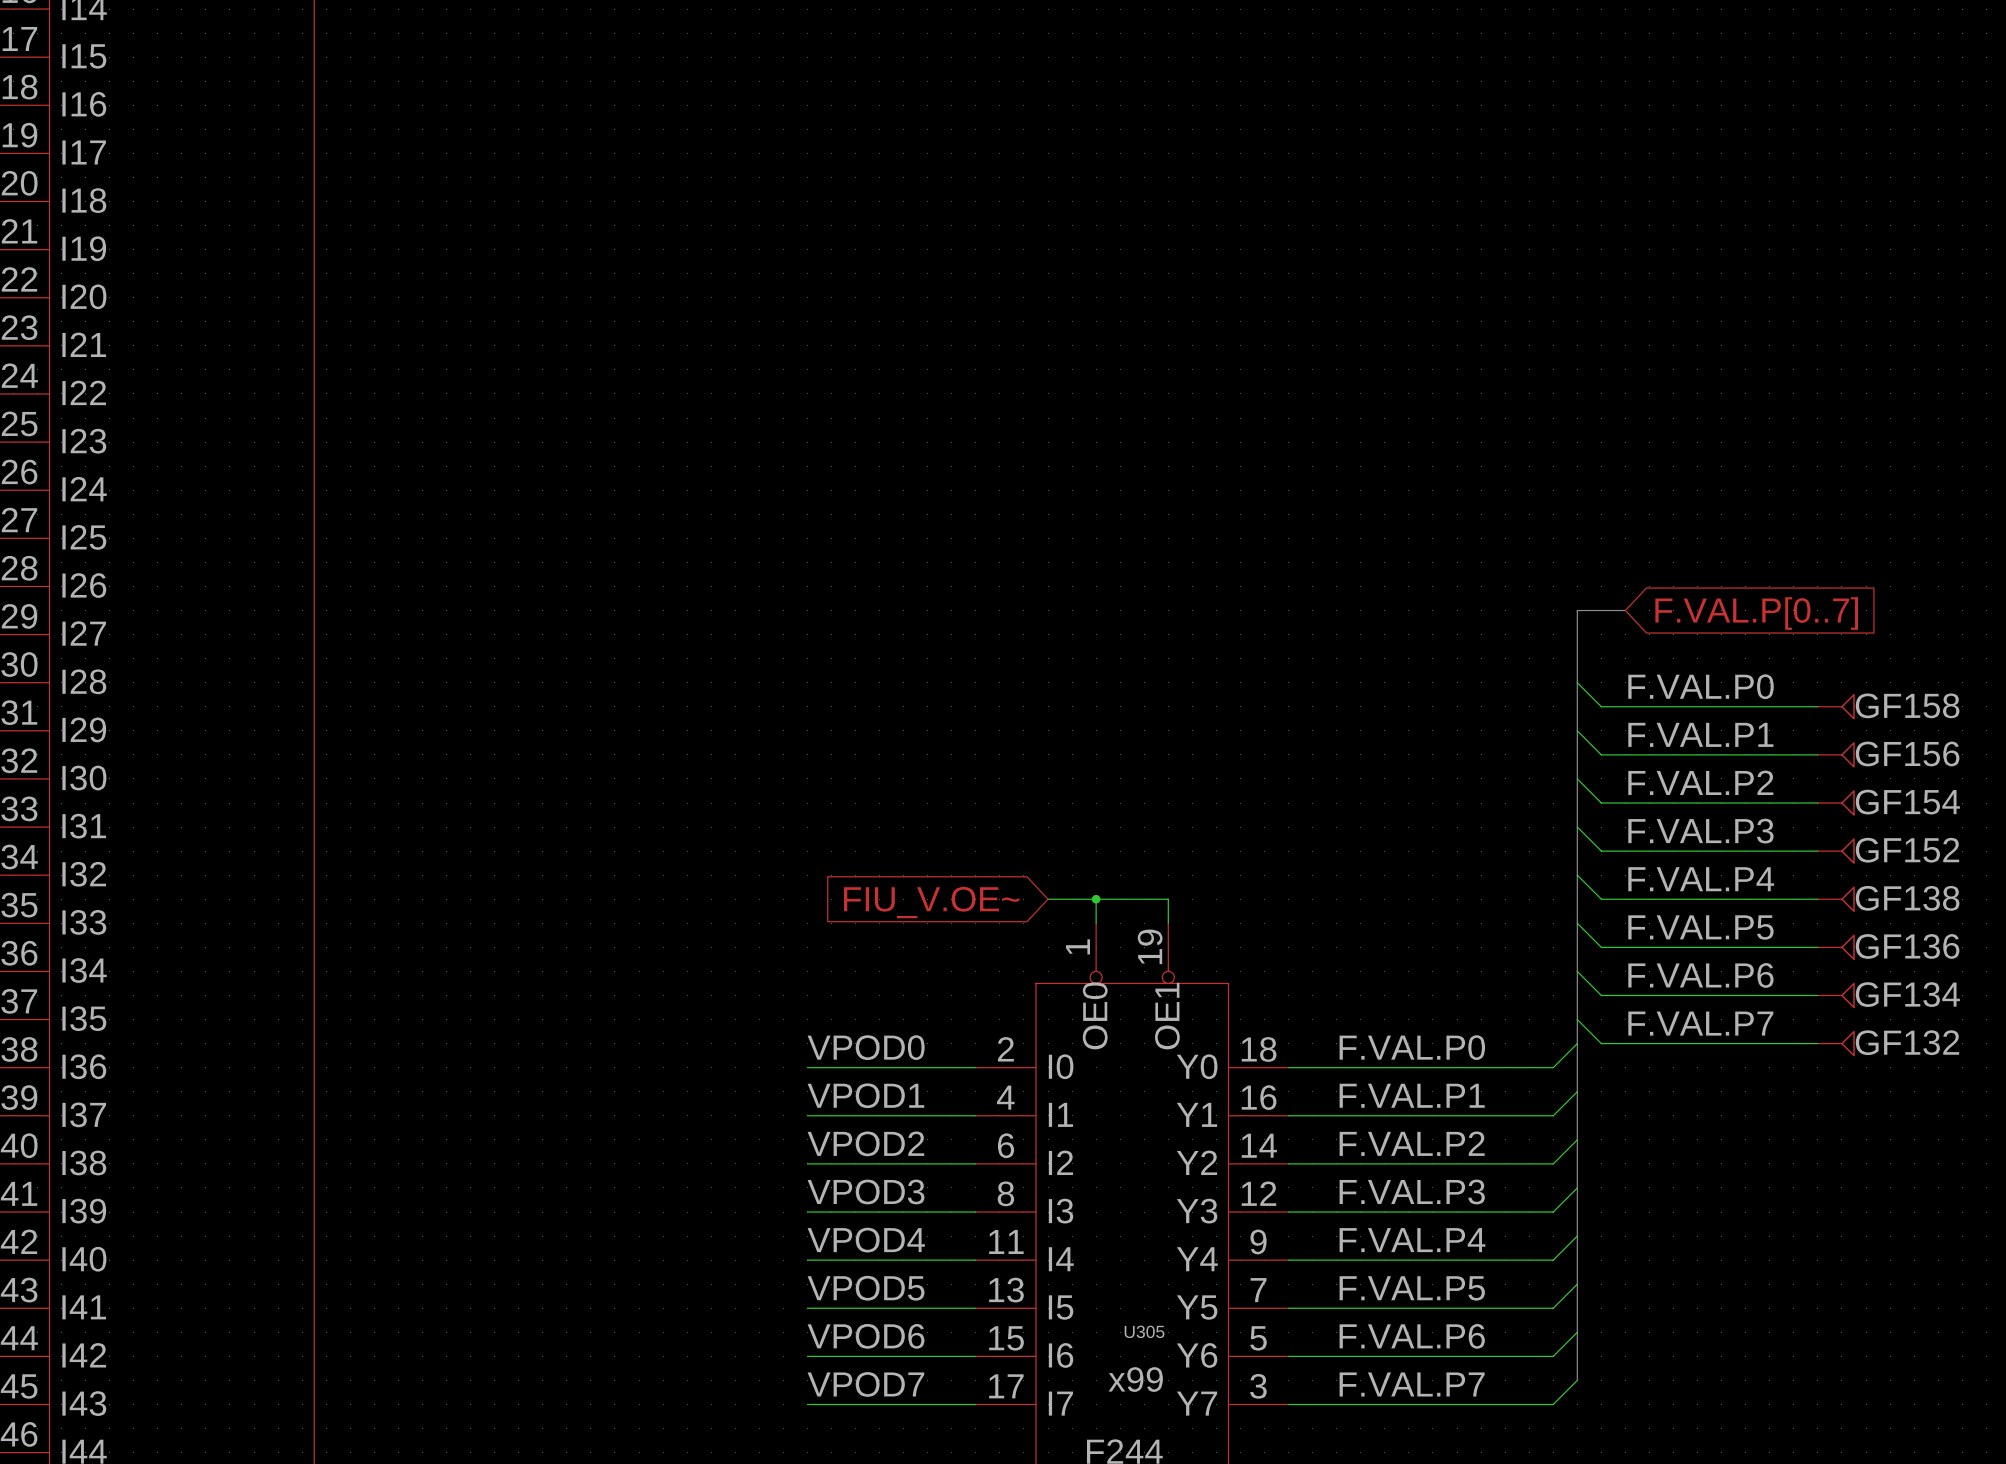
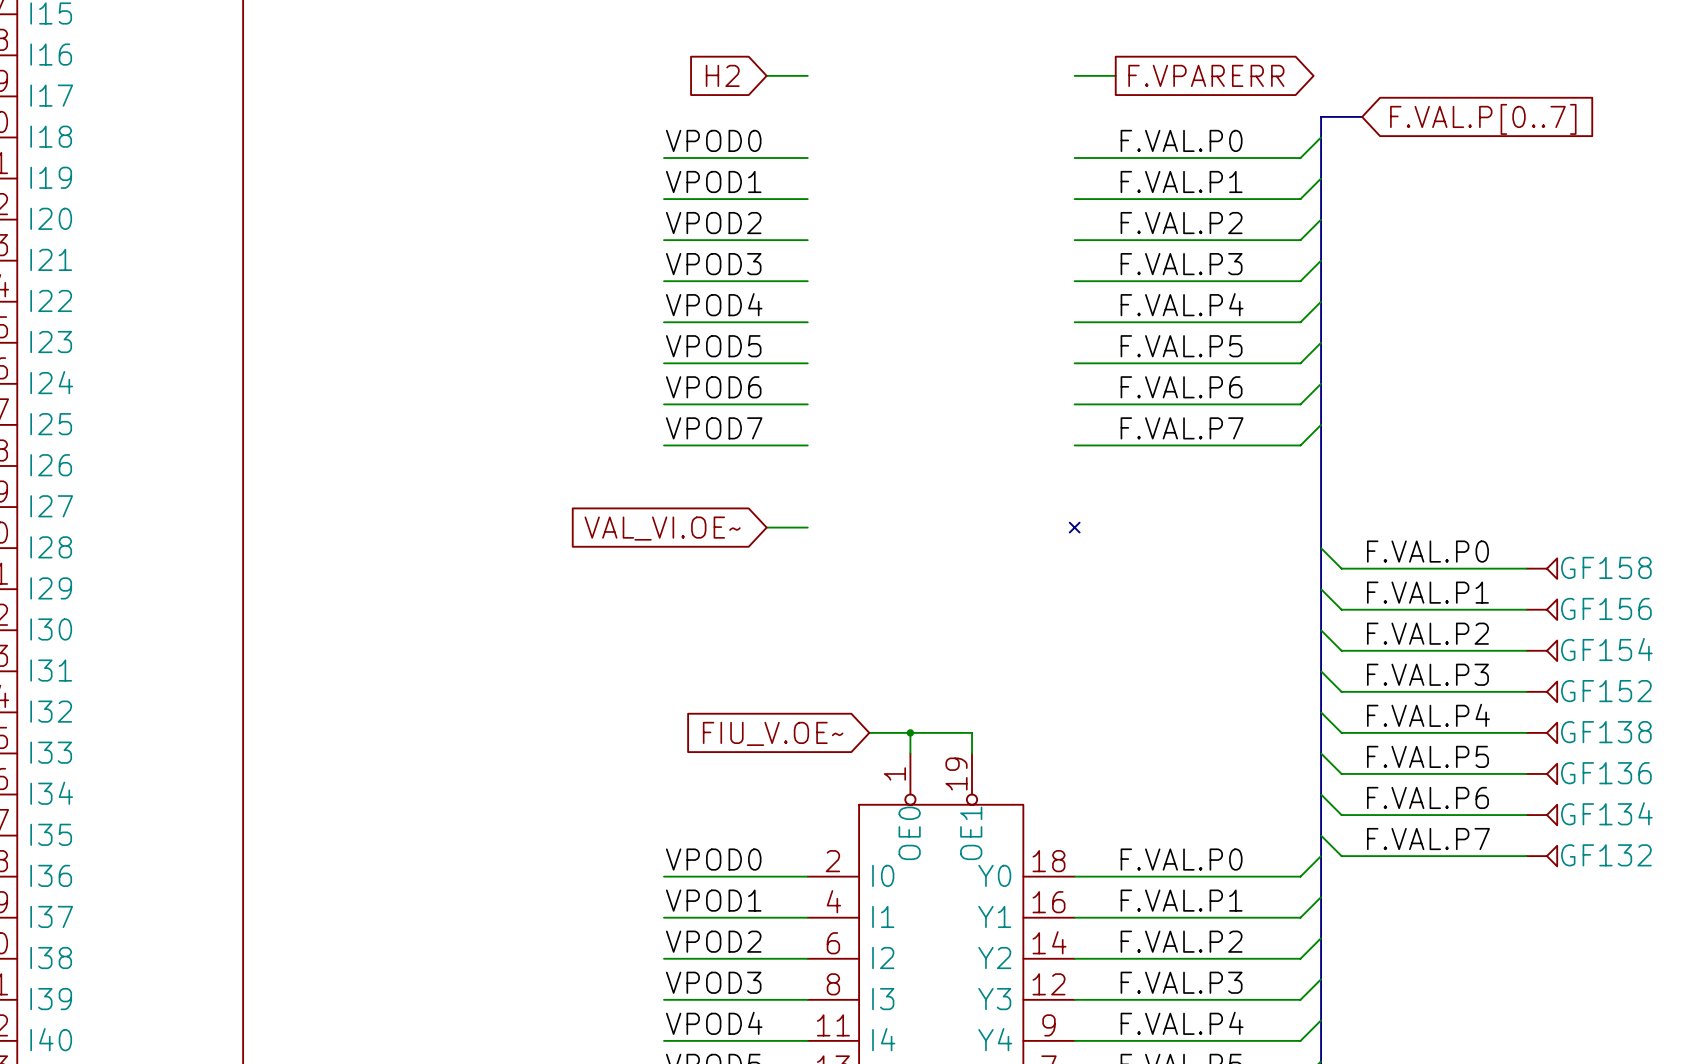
global label: none -> H2 (722, 75)
wire: none -> (766, 75) (807, 75)
wire: none -> (1074, 75) (1115, 75)
global label: none -> F.VPARERR (1206, 75)
global label: none -> F.VAL.P[0..7] (1483, 119)
wire: none -> (1321, 137) (1300, 158) (1074, 158)
label: none -> VPOD0 (713, 140)
label: none -> F.VAL.P0 (1181, 140)
wire: none -> (664, 158) (807, 158)
wire: none -> (1321, 178) (1300, 199) (1074, 199)
label: none -> VPOD1 (713, 181)
label: none -> F.VAL.P1 (1181, 181)
wire: none -> (664, 199) (807, 199)
wire: none -> (1321, 219) (1300, 240) (1074, 240)
label: none -> VPOD2 (713, 223)
label: none -> F.VAL.P2 (1181, 223)
wire: none -> (664, 240) (807, 240)
wire: none -> (1321, 260) (1300, 281) (1074, 281)
label: none -> VPOD3 (713, 264)
label: none -> F.VAL.P3 (1181, 264)
wire: none -> (664, 281) (807, 281)
wire: none -> (1321, 301) (1300, 322) (1074, 322)
label: none -> VPOD4 (714, 304)
label: none -> F.VAL.P4 (1182, 304)
wire: none -> (664, 322) (807, 322)
wire: none -> (1321, 342) (1300, 363) (1074, 363)
label: none -> VPOD5 (713, 346)
label: none -> F.VAL.P5 (1181, 346)
wire: none -> (664, 363) (807, 363)
wire: none -> (1321, 383) (1300, 404) (1074, 404)
label: none -> VPOD6 (713, 387)
label: none -> F.VAL.P6 (1181, 387)
wire: none -> (664, 404) (807, 404)
wire: none -> (1321, 424) (1300, 445) (1074, 445)
label: none -> VPOD7 (714, 428)
label: none -> F.VAL.P7 (1182, 428)
wire: none -> (664, 445) (807, 445)
bus: (1577, 610) (1625, 610) -> (1321, 486) (1321, 116) (1362, 116)
global label: F.VAL.P[0..7] (1756, 613) -> none
wire: none -> (766, 527) (807, 527)
no-connect mark: none -> (1074, 527)
global label: none -> VAL_VI.OE~ (662, 528)

